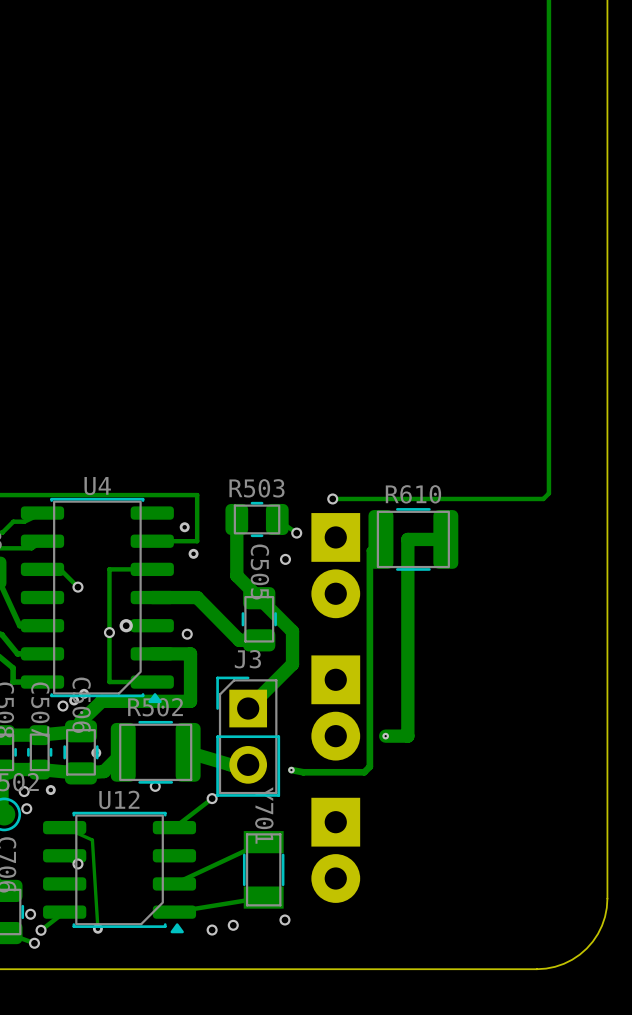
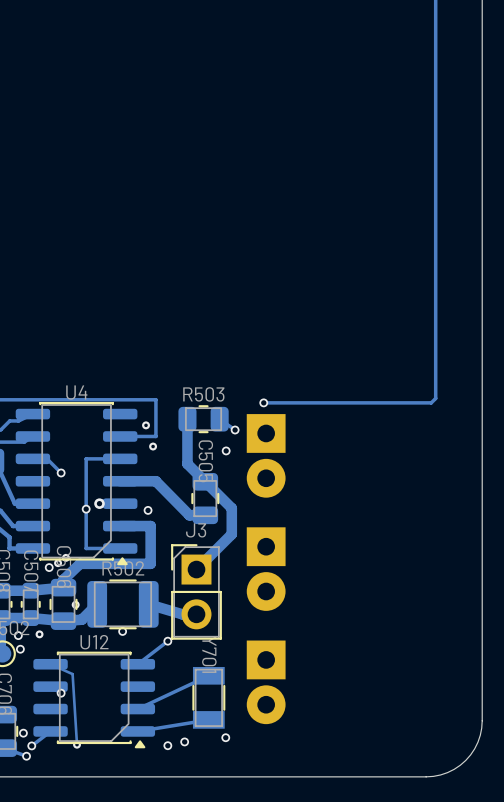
track: (380, 539) (369, 550) (369, 766) (364, 772) (303, 772) (291, 770) -> none
R610: (413, 539) -> none
track: (445, 539) (407, 539) (407, 736) (385, 736) -> none
via: (385, 736) -> none
via: (291, 770) -> none

